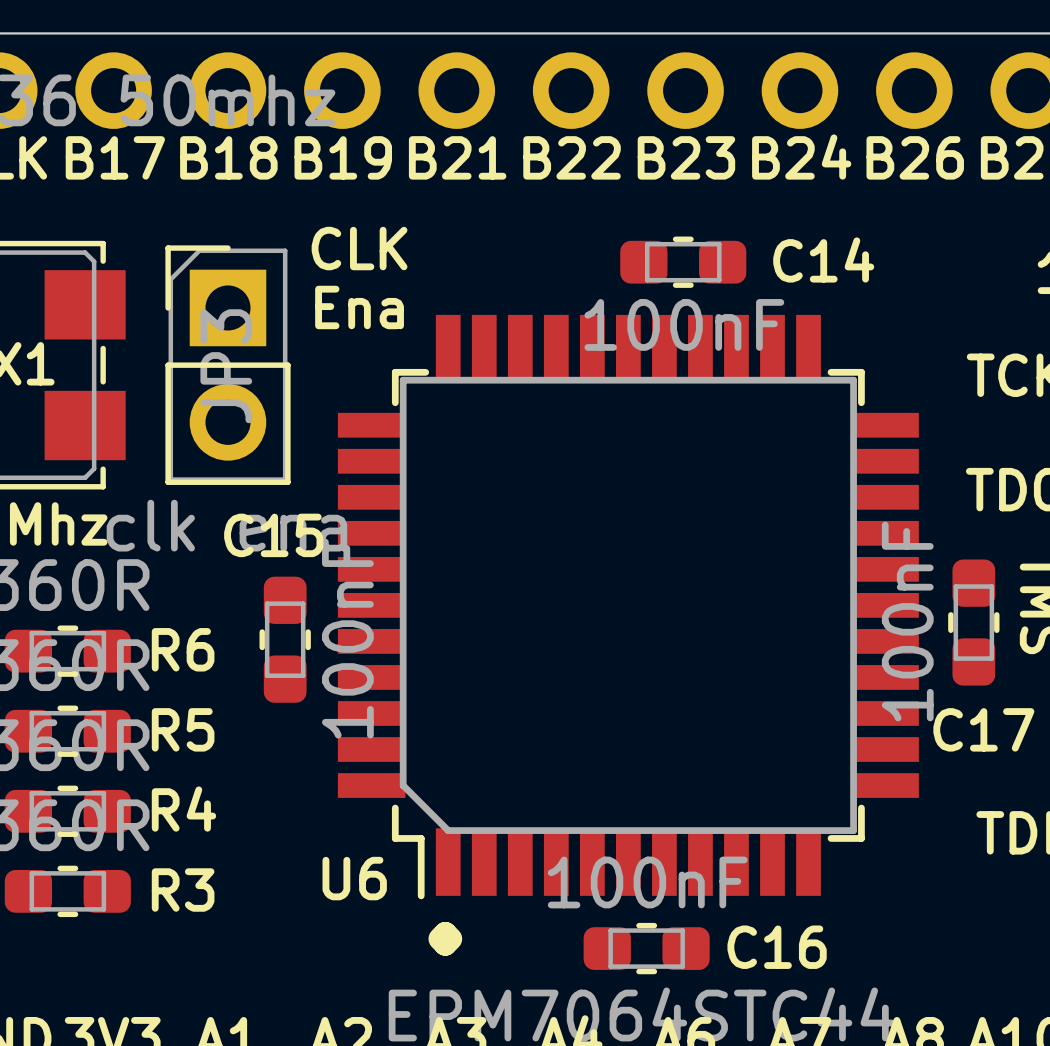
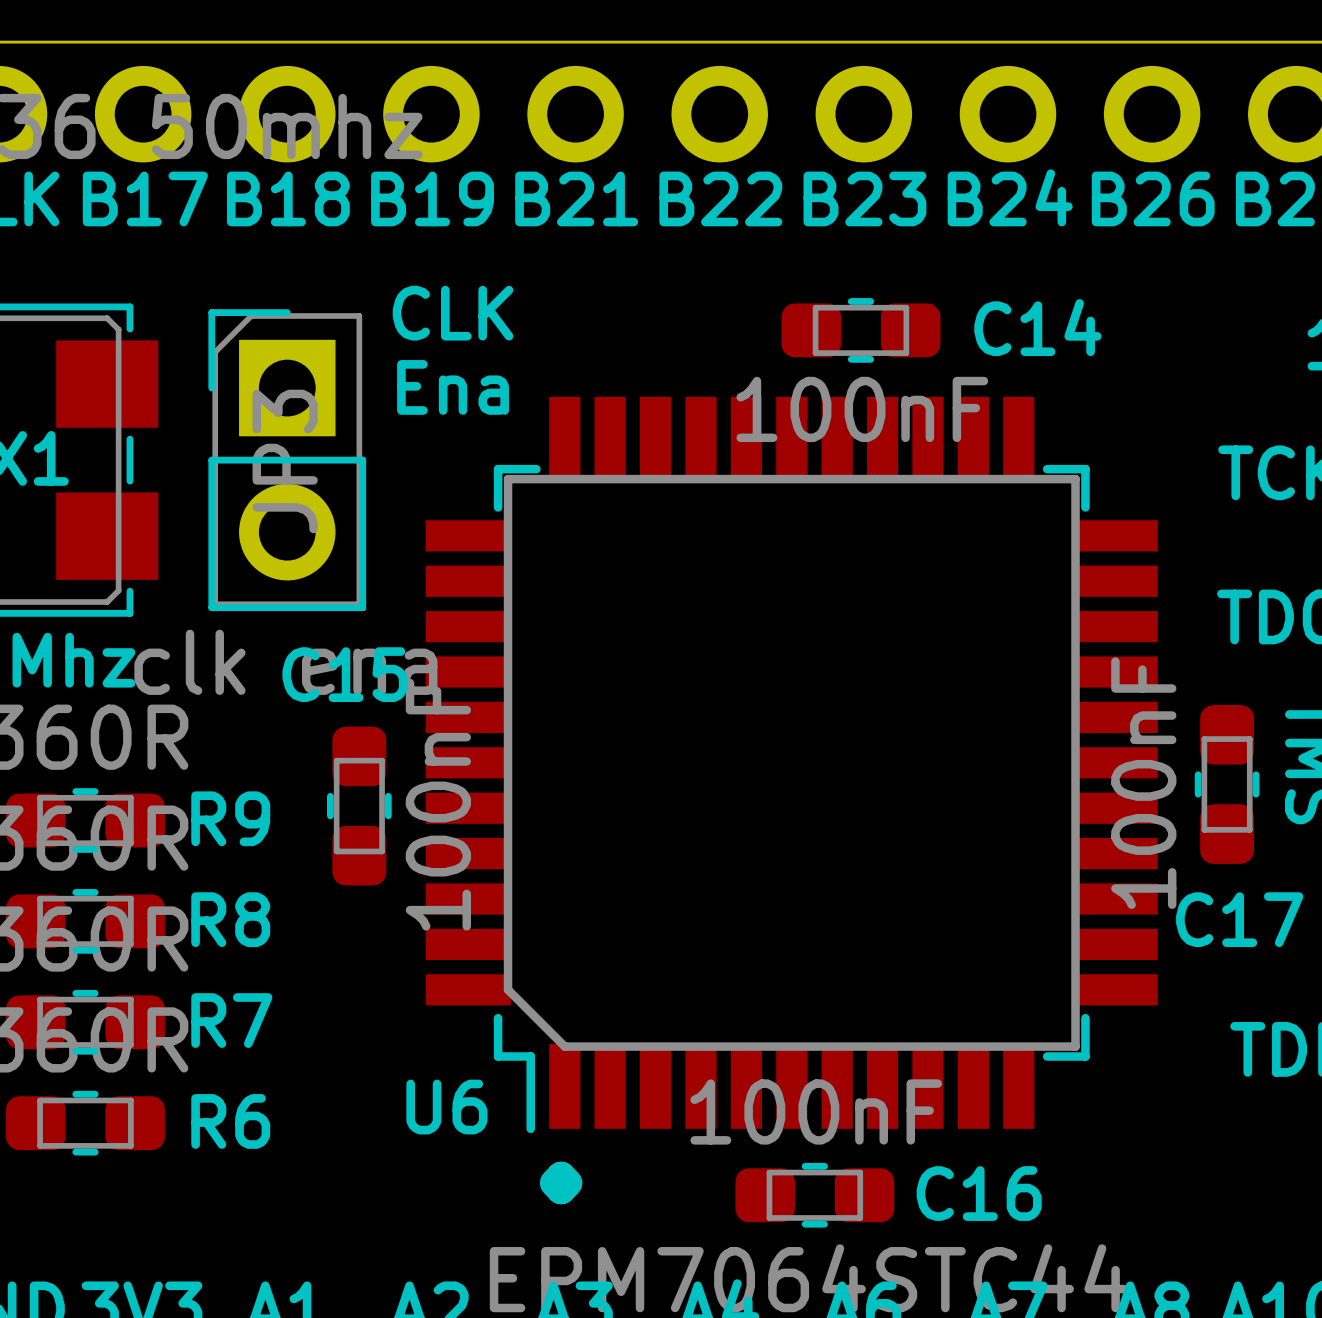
R6 name: R6 (183, 649) -> R9 (230, 818)
R5 name: R5 (183, 729) -> R8 (230, 919)
R4 name: R4 (183, 809) -> R7 (231, 1020)
R3 name: R3 (183, 890) -> R6 (230, 1121)

